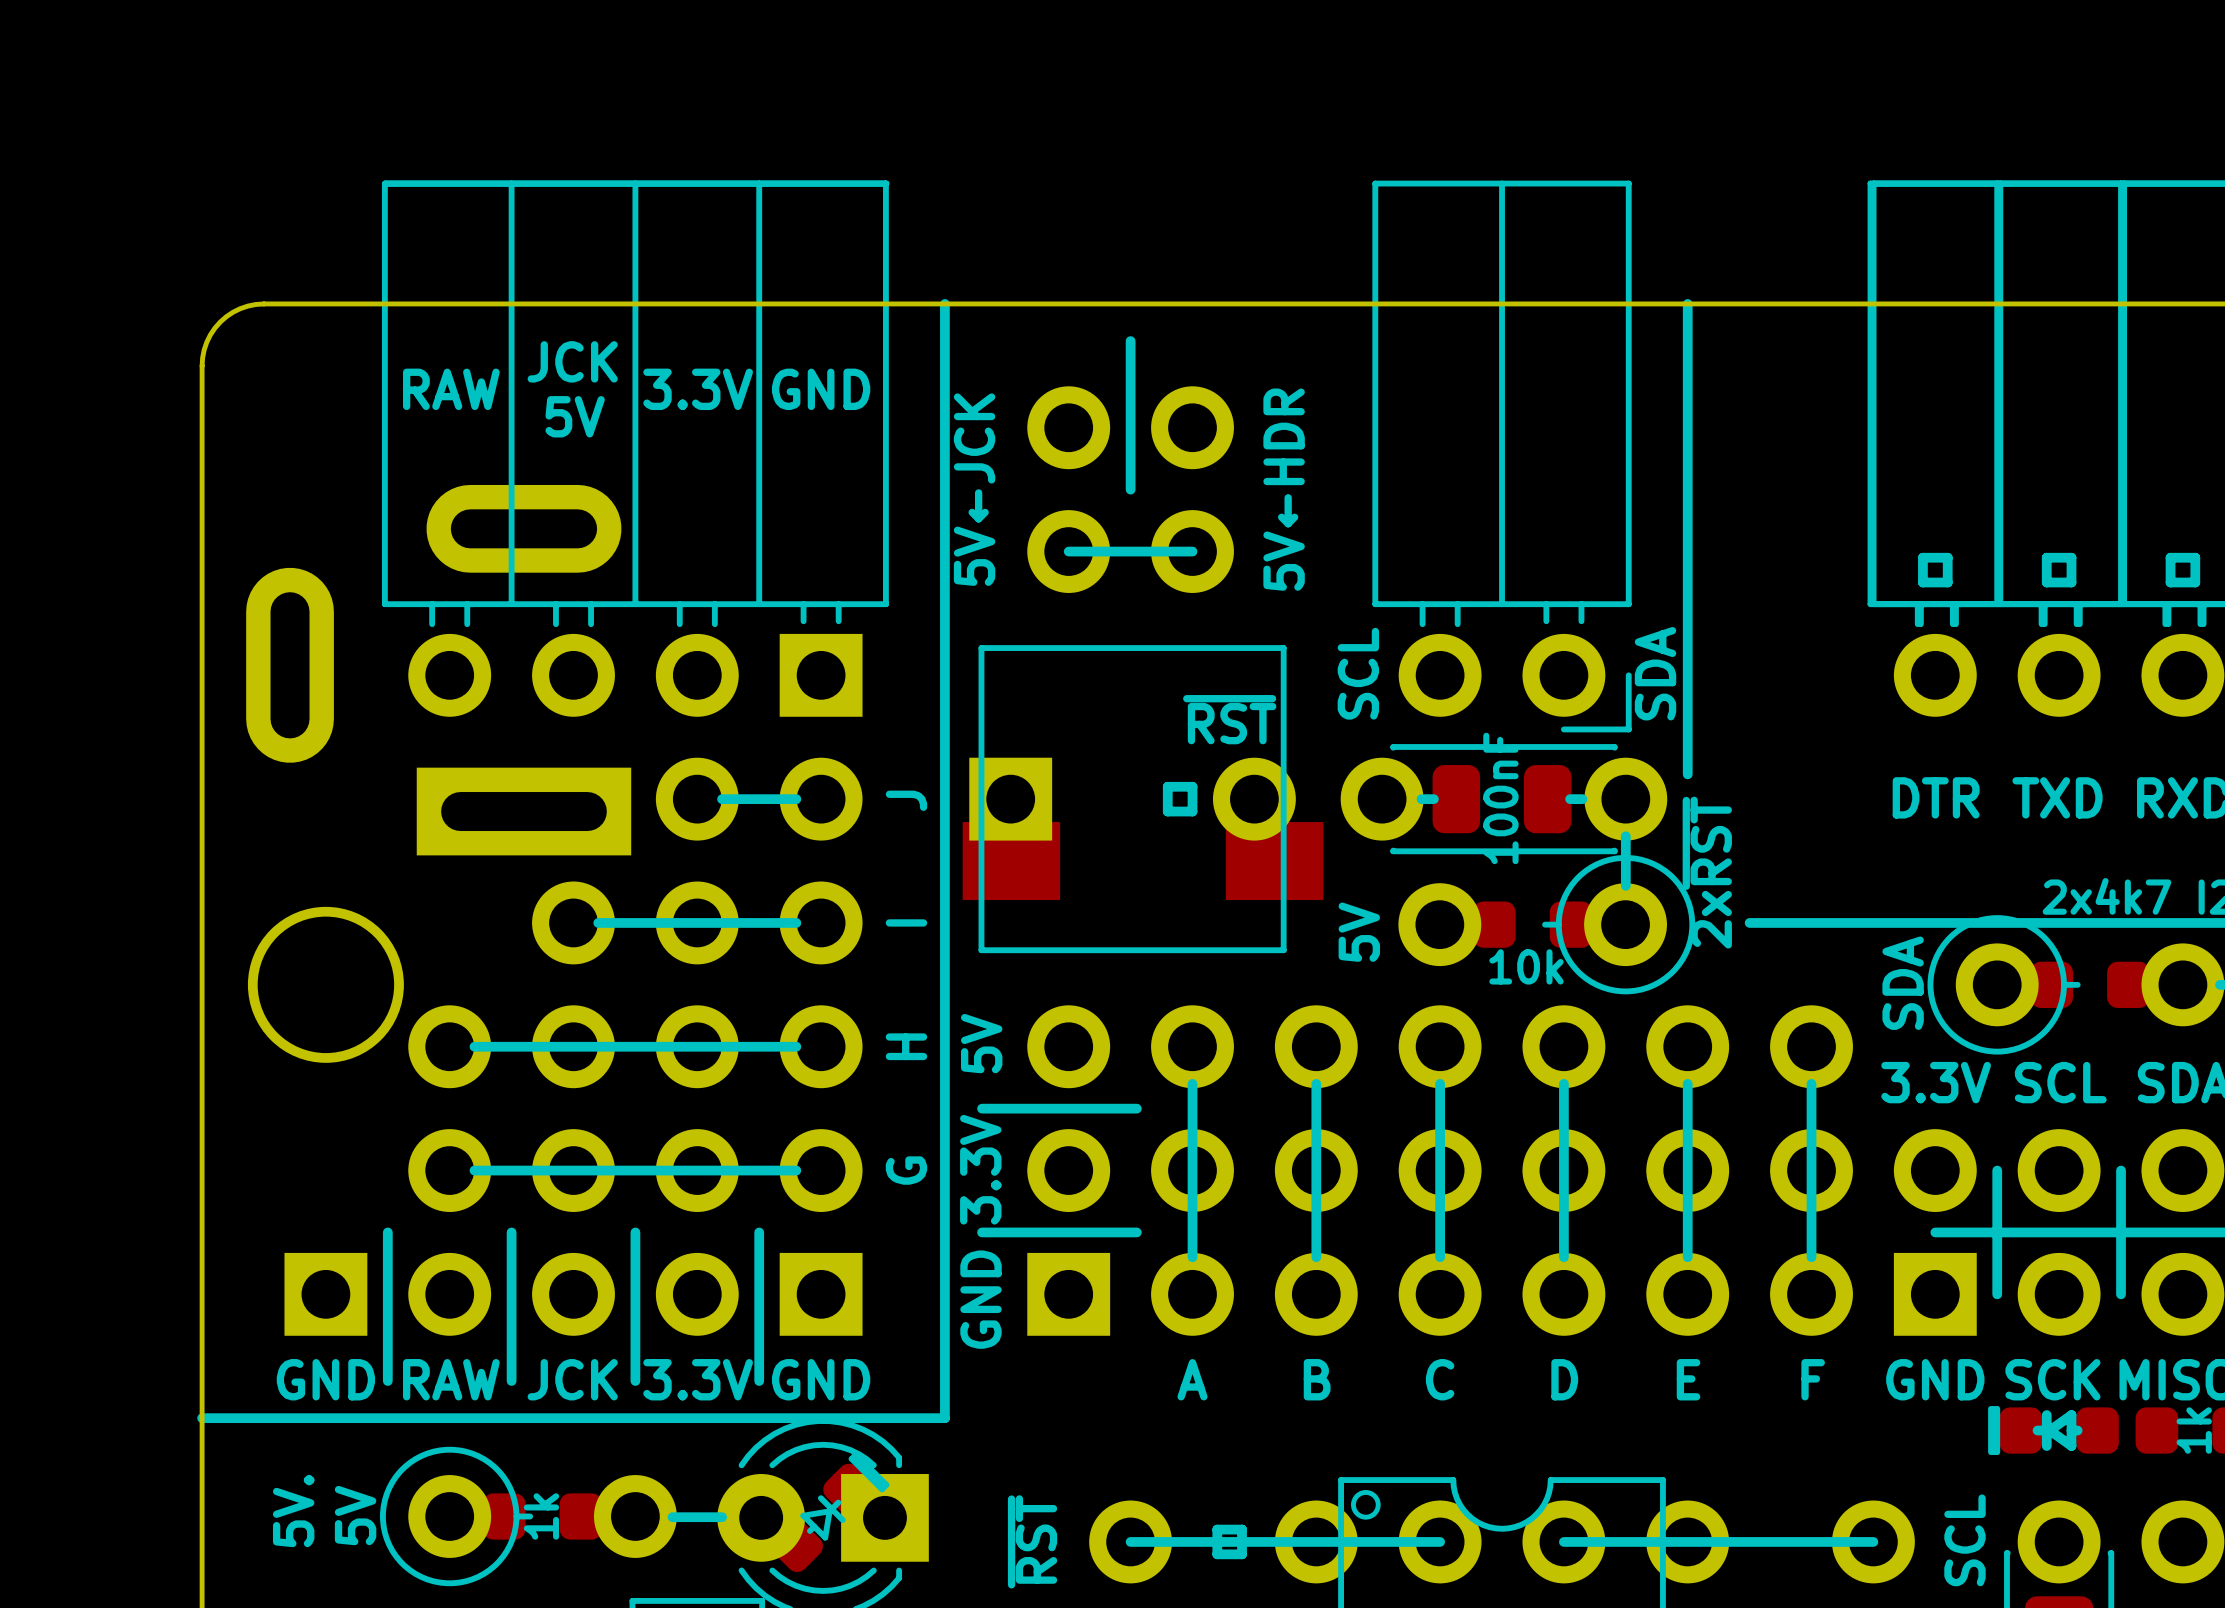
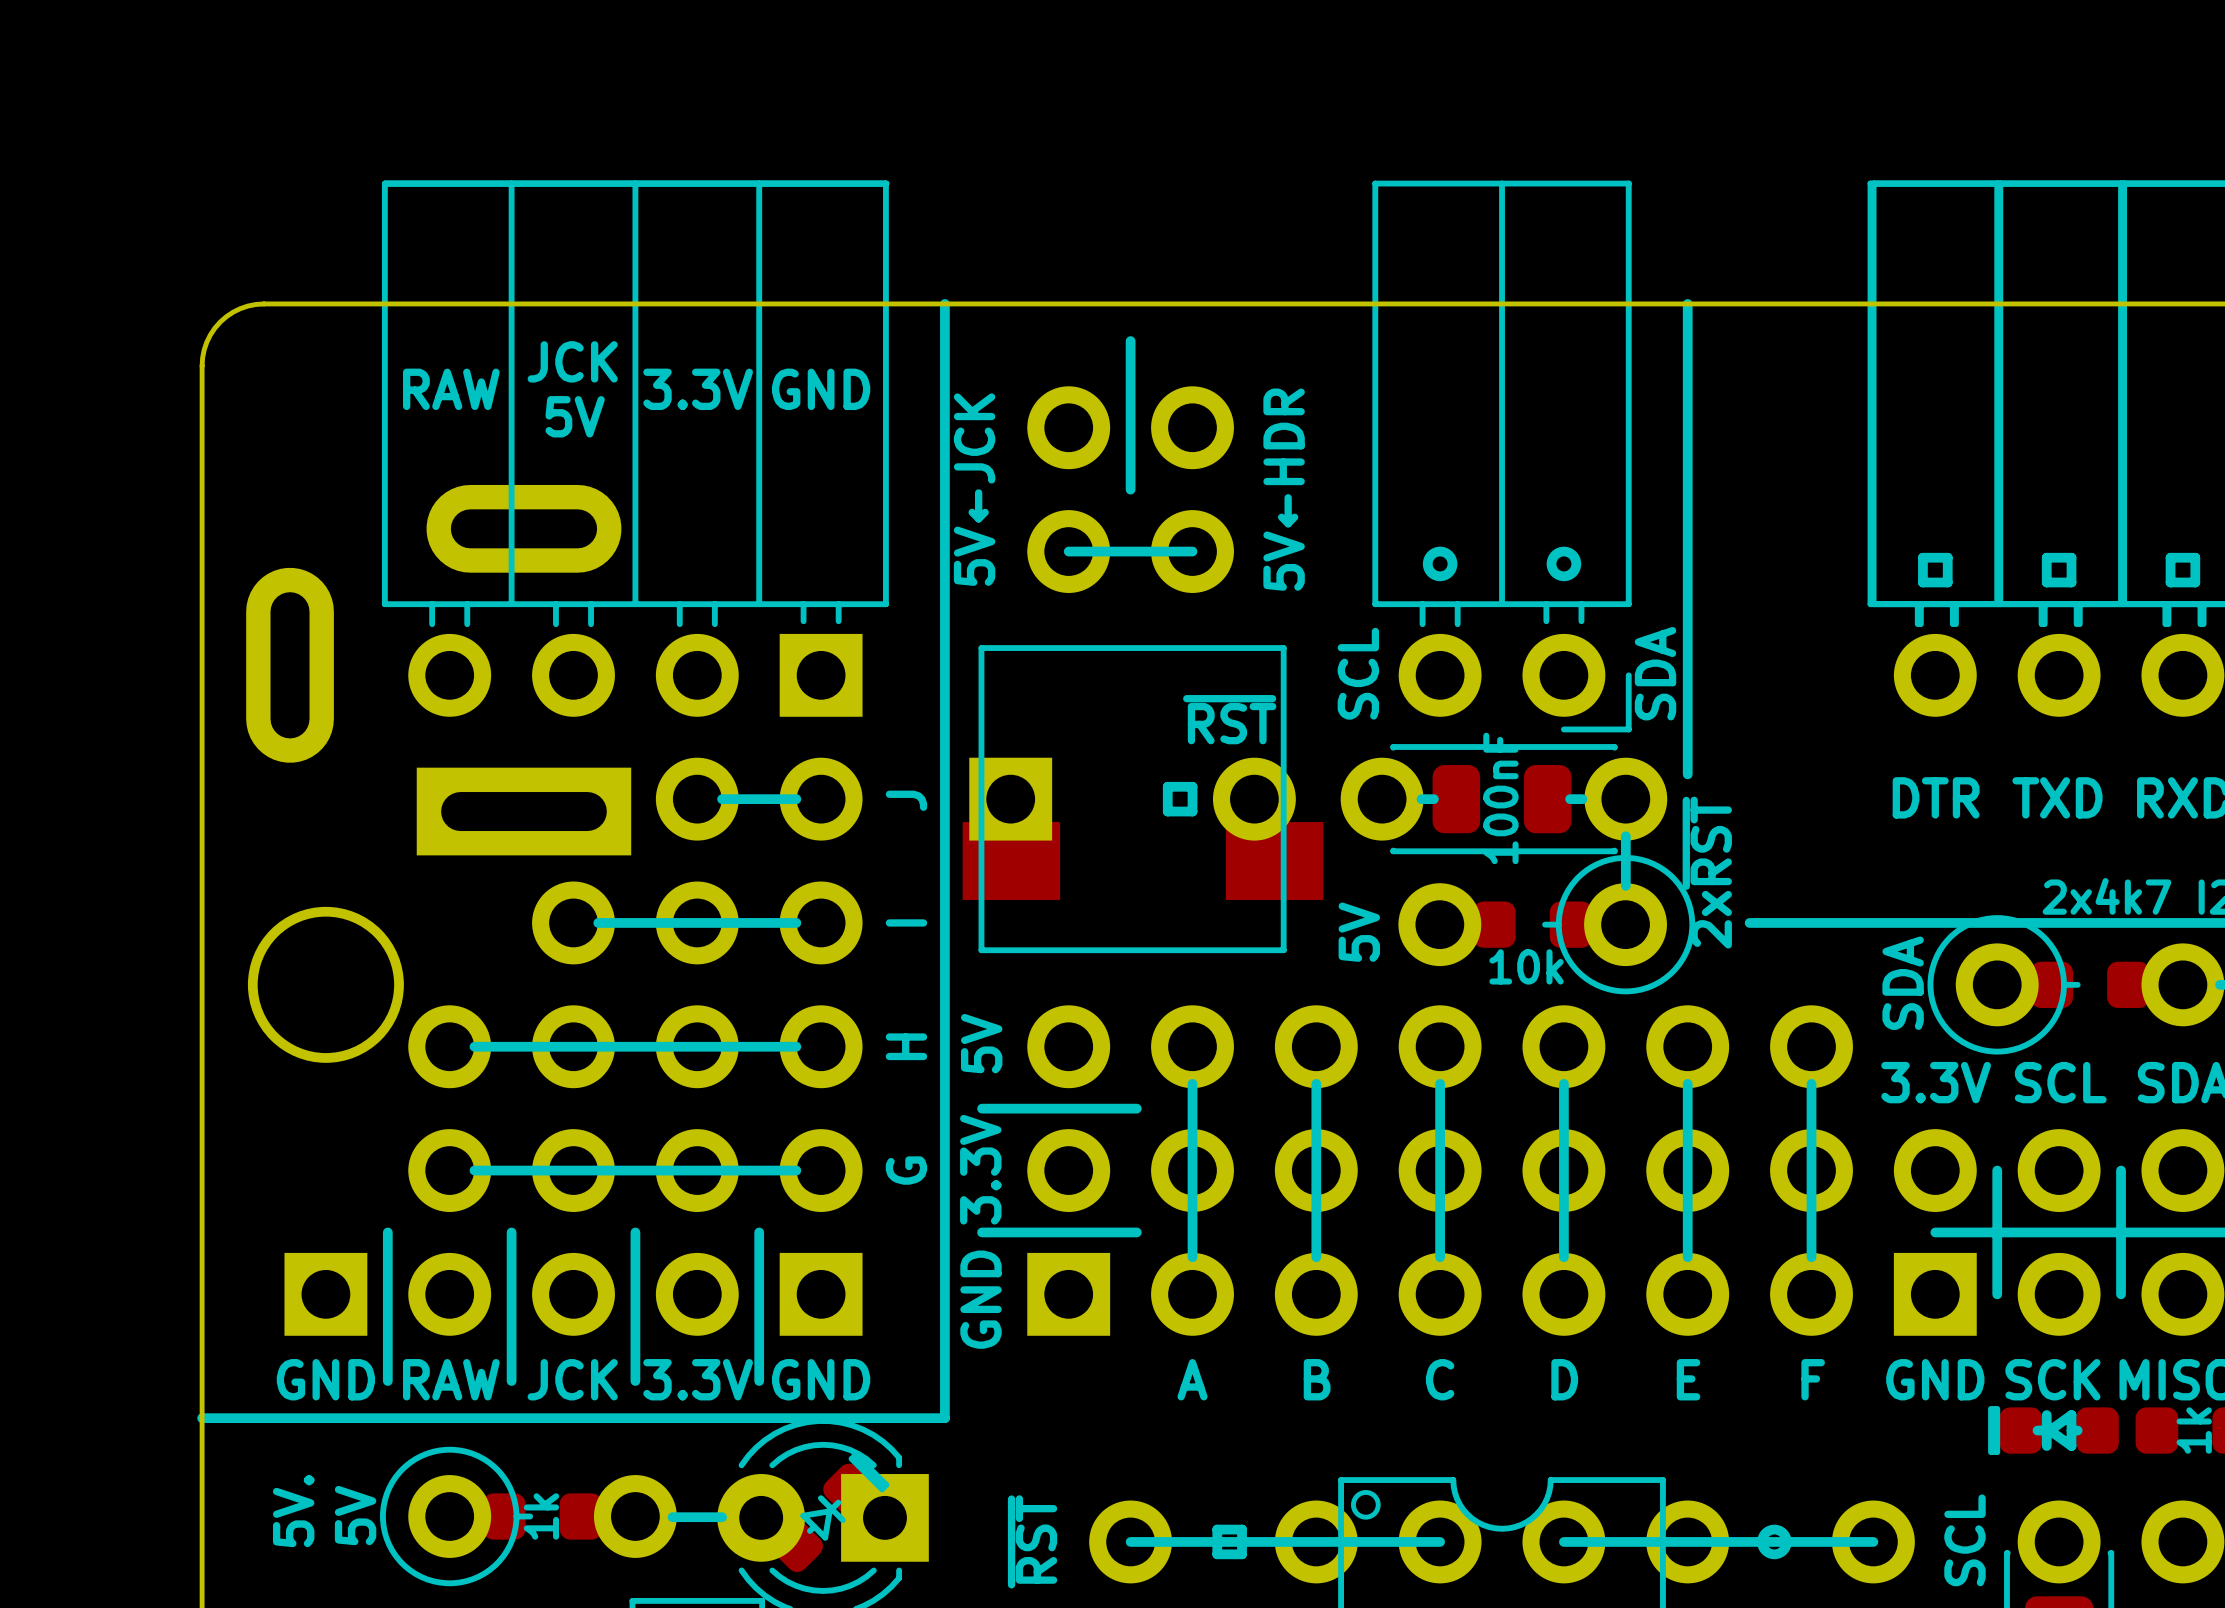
drawing: none -> [1422, 546, 1458, 582]
drawing: none -> [1546, 546, 1582, 582]
drawing: none -> [1757, 1524, 1792, 1560]

